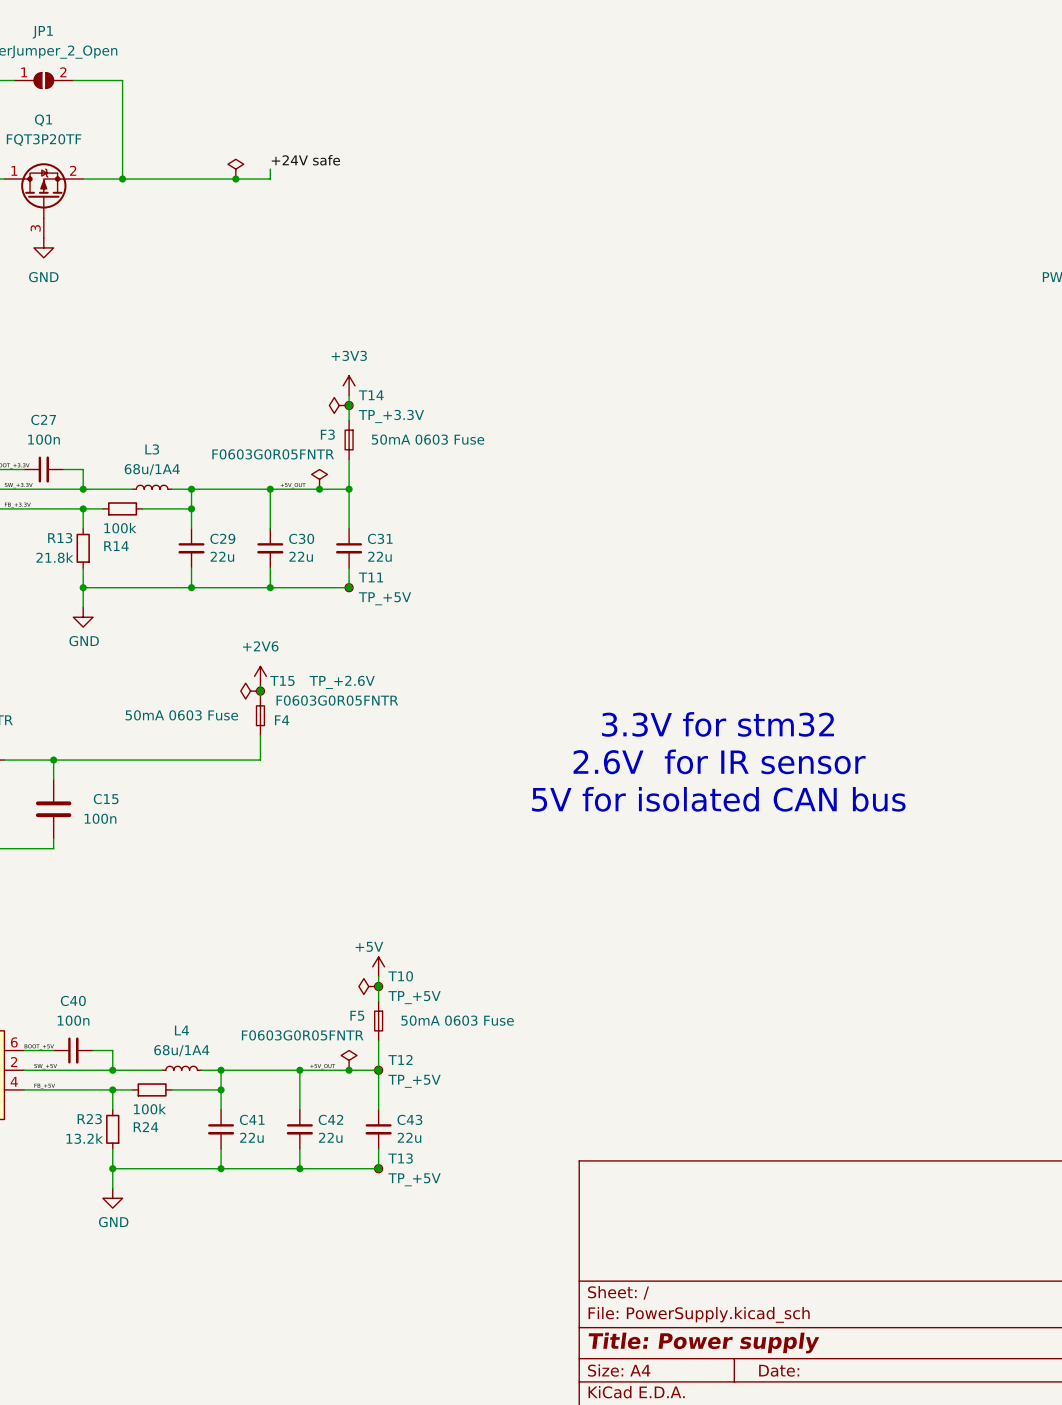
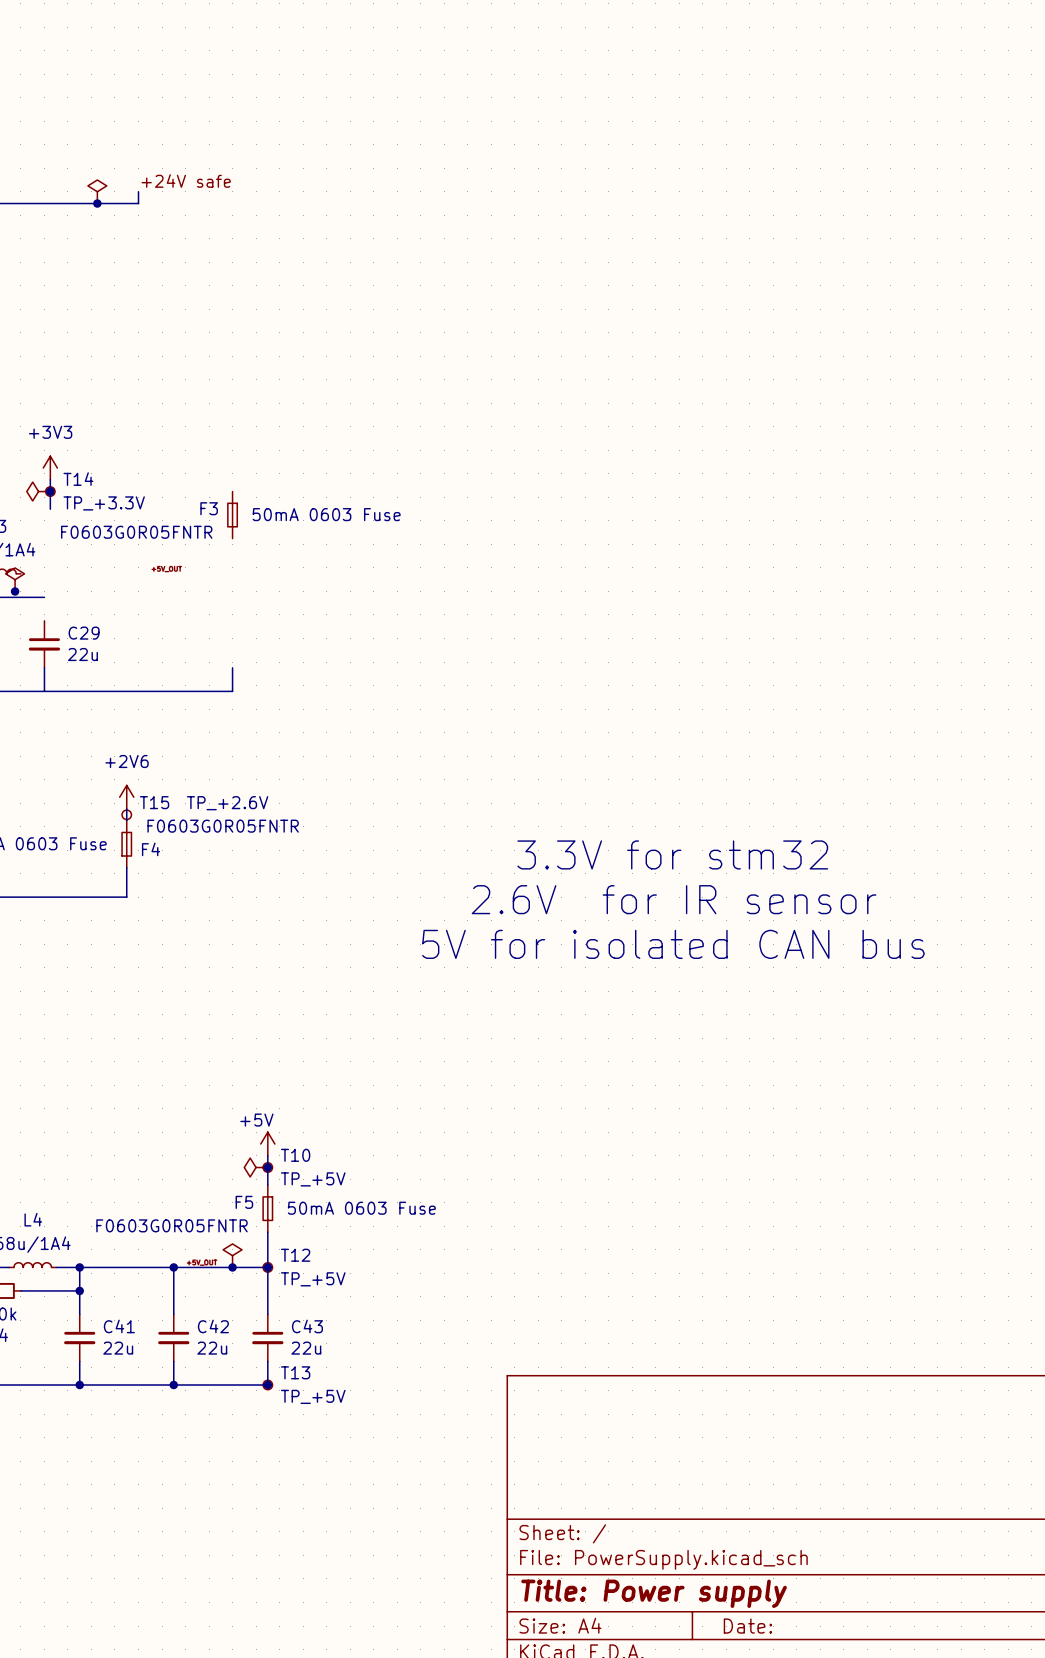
power symbol position: +3V3 (349, 385) -> +3V3 (50, 468)
wire: (349, 395) (349, 420) -> (50, 479) (50, 509)
power symbol: (339, 405) -> none
junction: (349, 405) -> none
T14 position: (349, 405) -> (50, 491)
power symbol: none -> (38, 491)
junction: none -> (50, 491)
wire: (349, 459) (349, 528) -> none
power symbol: (319, 479) -> none
wire: (171, 489) (349, 489) -> none
wire: (191, 489) (191, 528) -> none
junction: (191, 489) -> none
wire: (270, 489) (270, 528) -> none
junction: (270, 489) -> none
junction: (319, 489) -> none
junction: (349, 489) -> none
power symbol: none -> (15, 579)
junction: none -> (15, 591)
junction: (191, 508) -> none
C30: 22u (270, 548) -> none
C31: 22u (349, 548) -> none
wire: (270, 567) (270, 587) -> none
junction: (191, 587) -> none
junction: (270, 587) -> none
junction: (349, 587) -> none
T11: TP_+5V (349, 587) -> none
power symbol: (250, 691) -> none
junction: (260, 691) -> none

